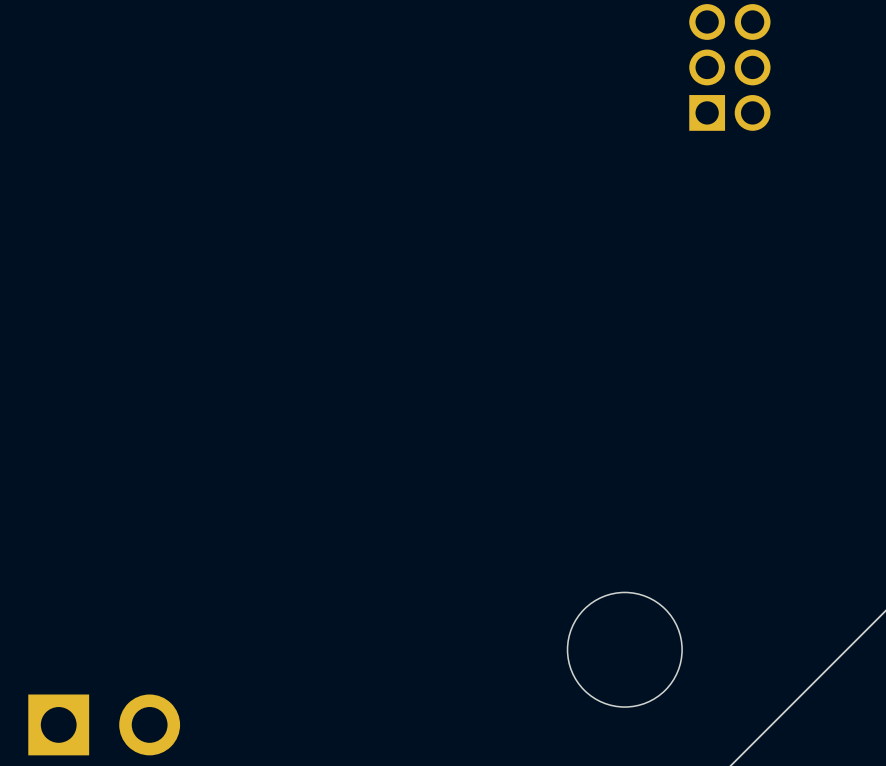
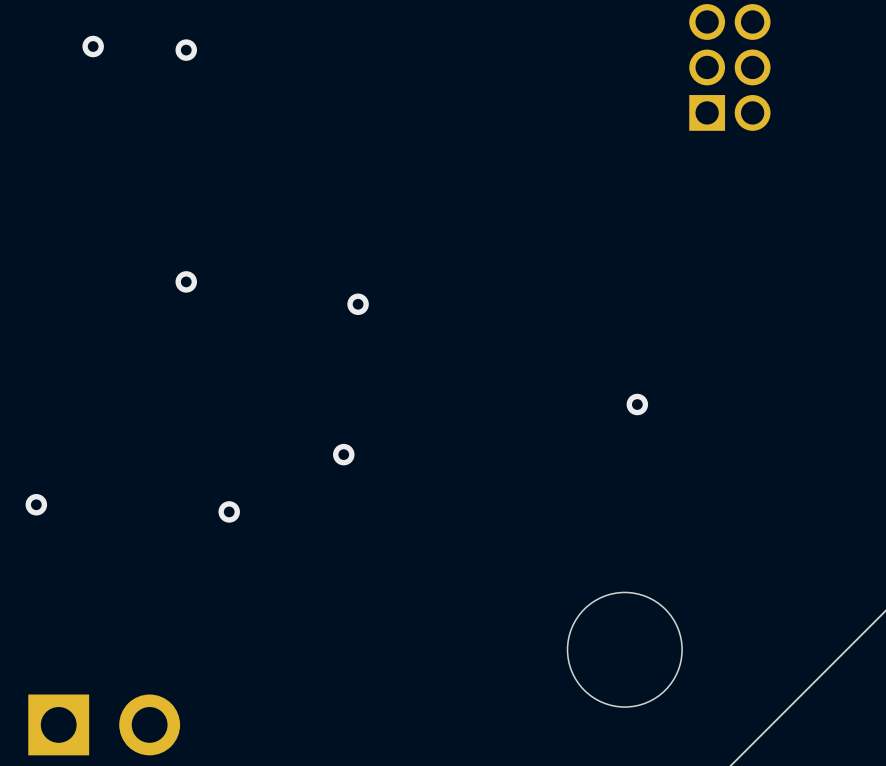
via: none -> (93, 46)
via: none -> (186, 50)
via: none -> (186, 281)
via: none -> (358, 304)
via: none -> (637, 404)
via: none -> (343, 454)
via: none -> (36, 504)
via: none -> (229, 511)

